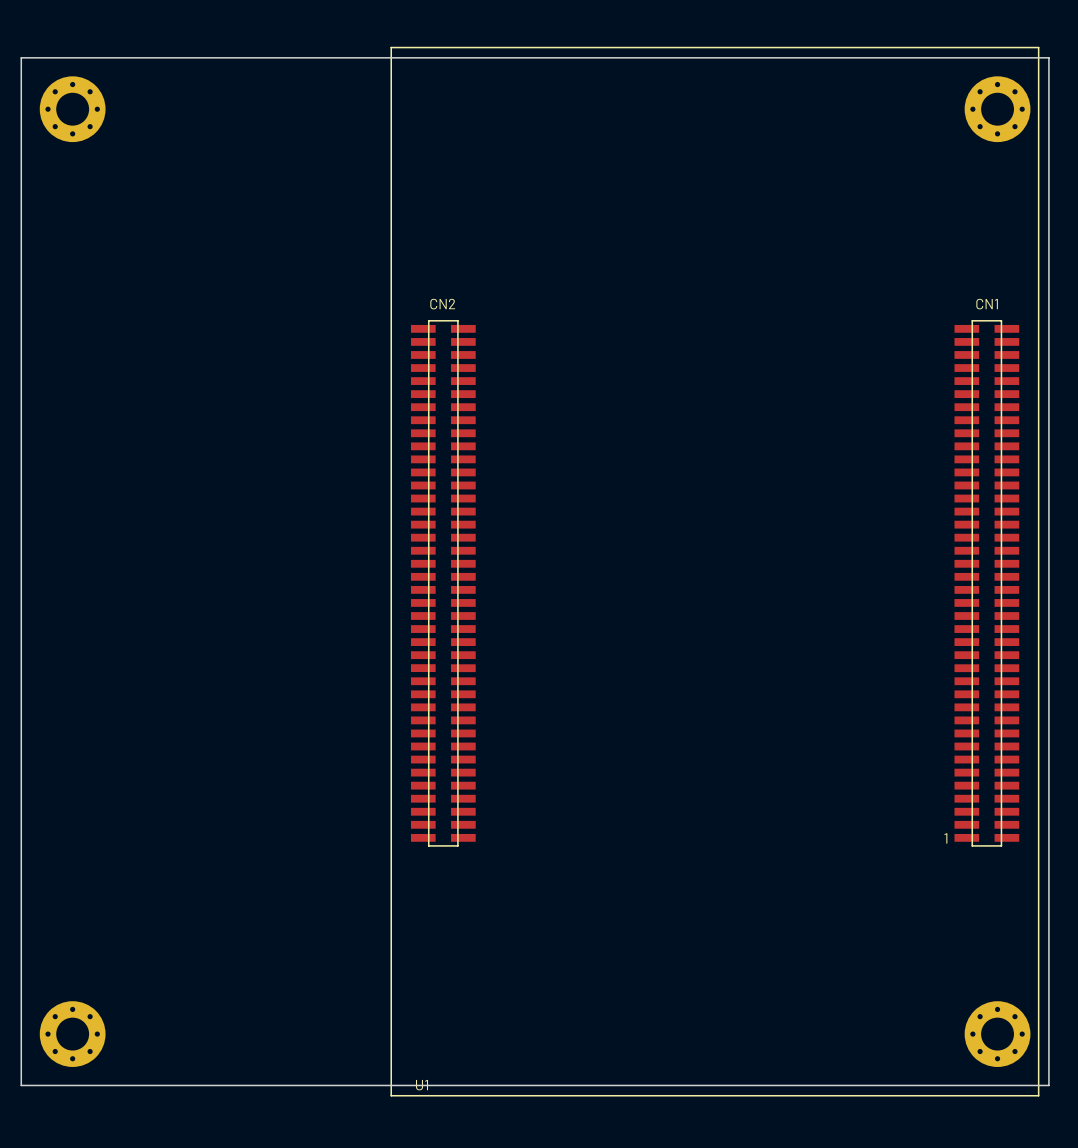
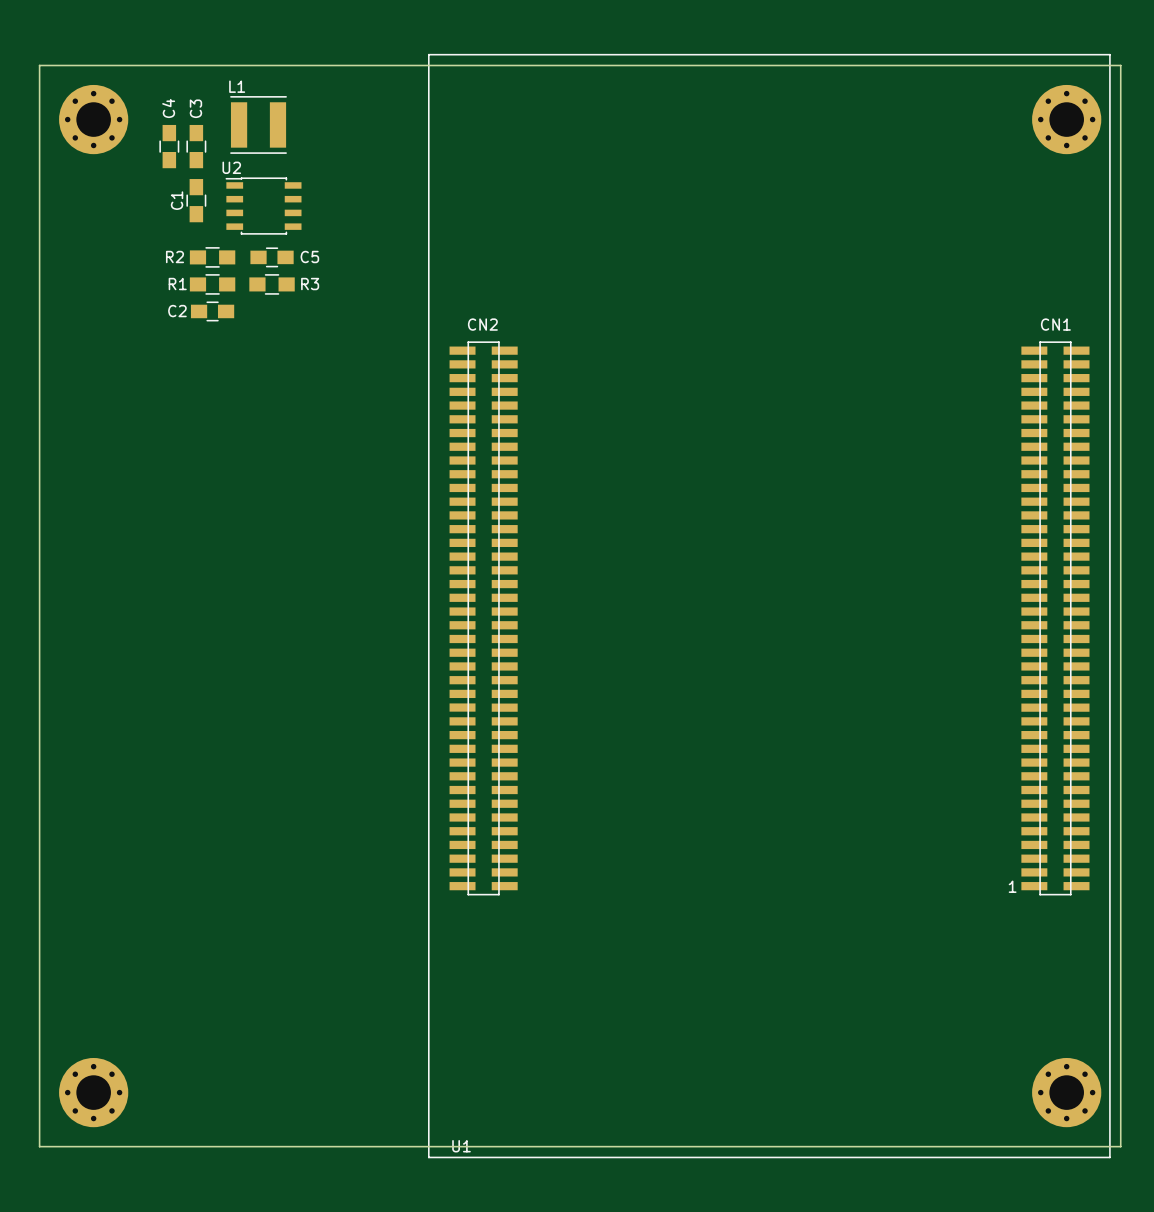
L1: none -> (258, 124)
C4: none -> (169, 146)
C3: none -> (196, 146)
C1: none -> (196, 200)
U2: none -> (263, 206)
R2: none -> (212, 257)
C5: none -> (272, 257)
R1: none -> (212, 284)
R3: none -> (272, 284)
C2: none -> (212, 311)

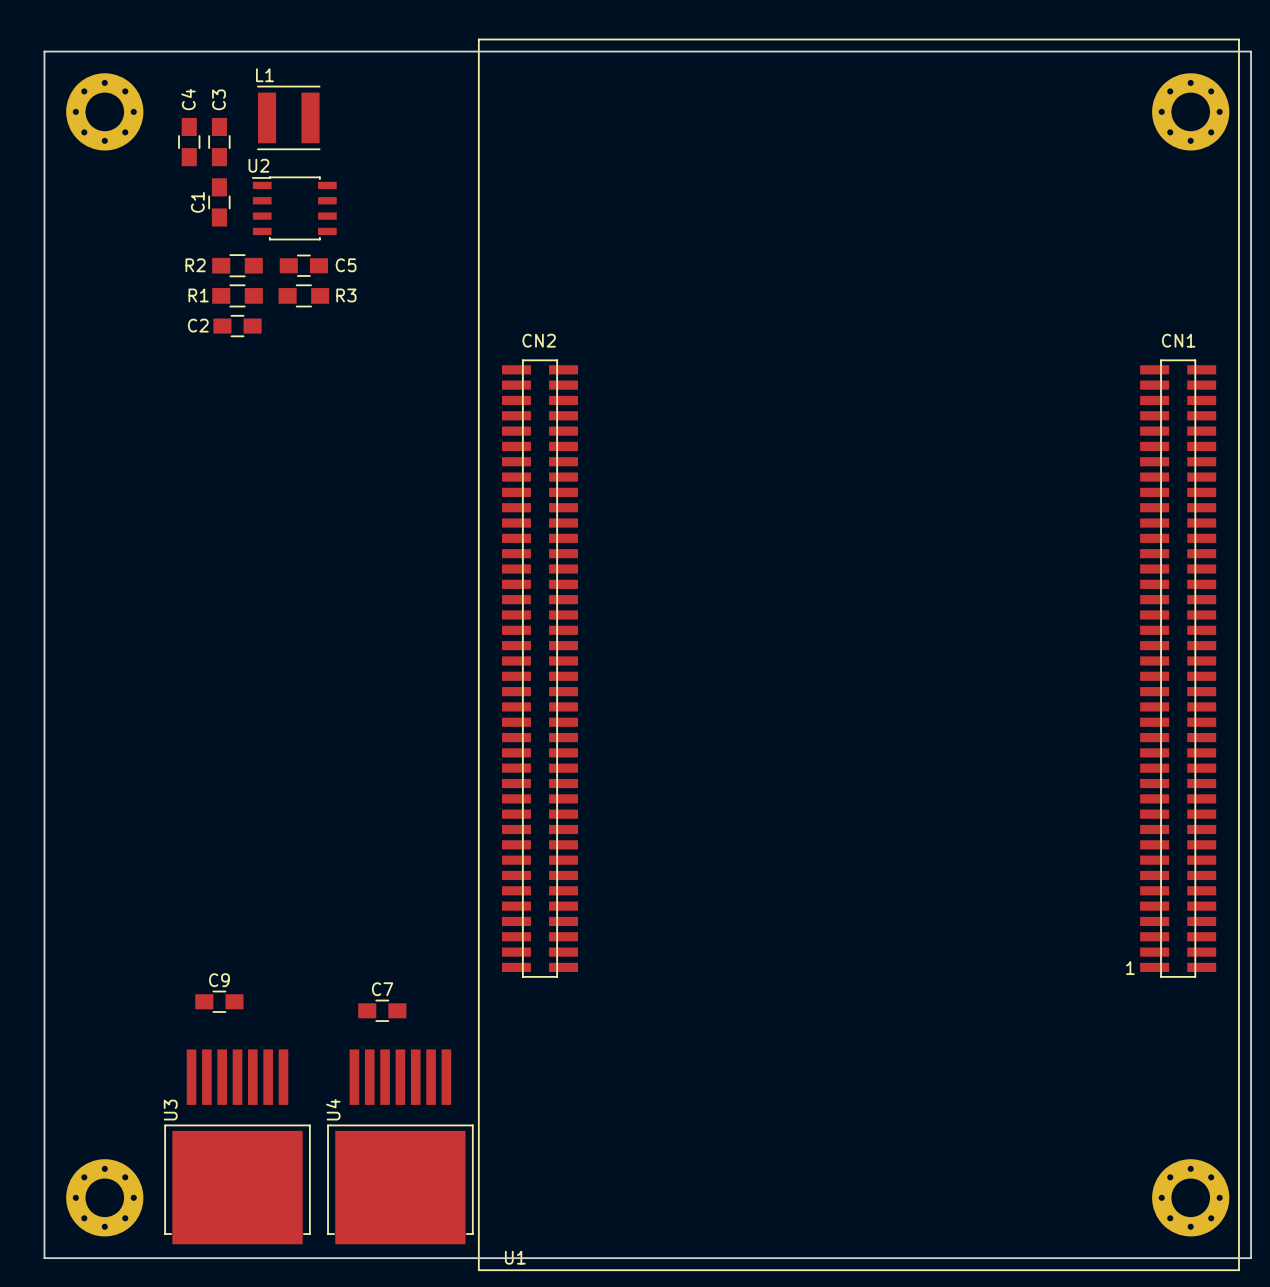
C9: none -> (219, 1001)
C7: none -> (382, 1010)
U3: none -> (237, 1146)
U4: none -> (400, 1146)

